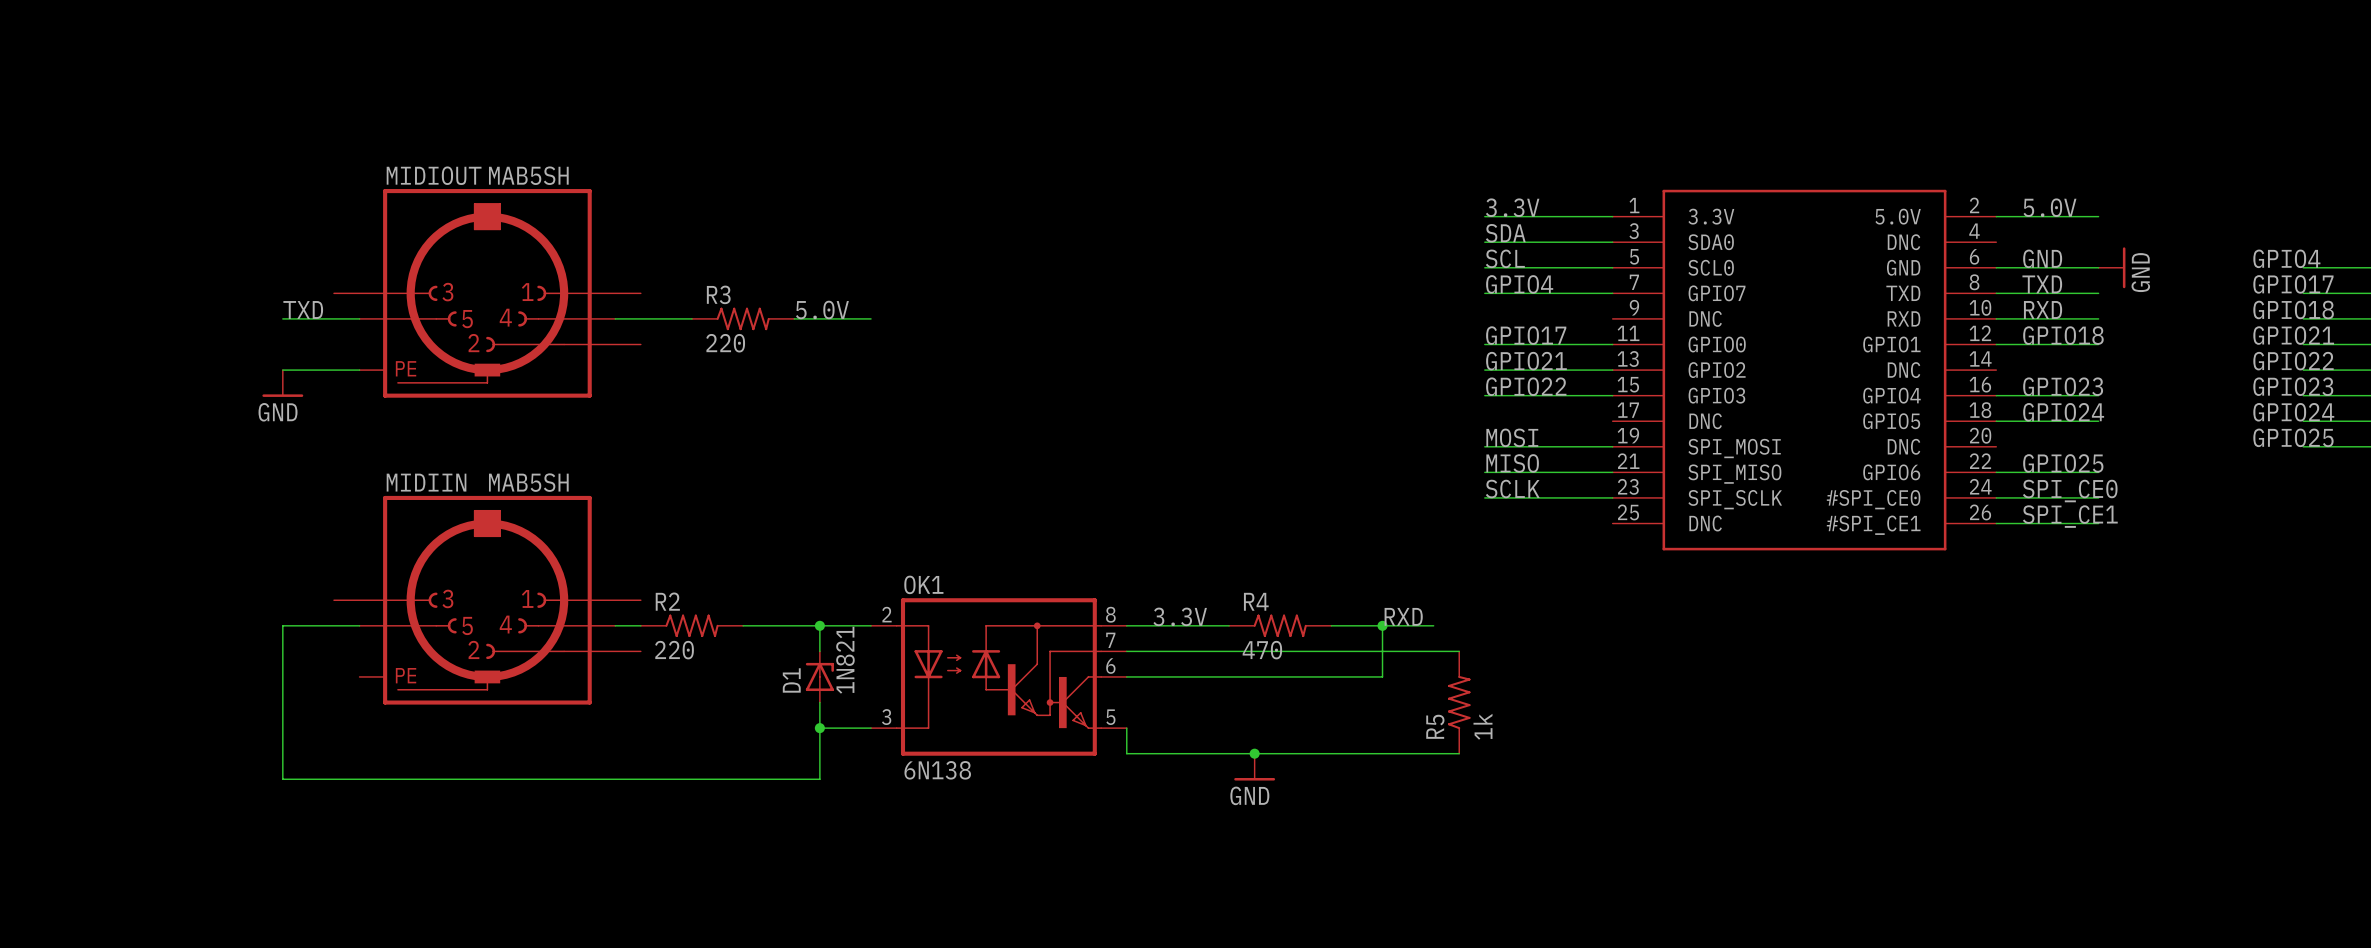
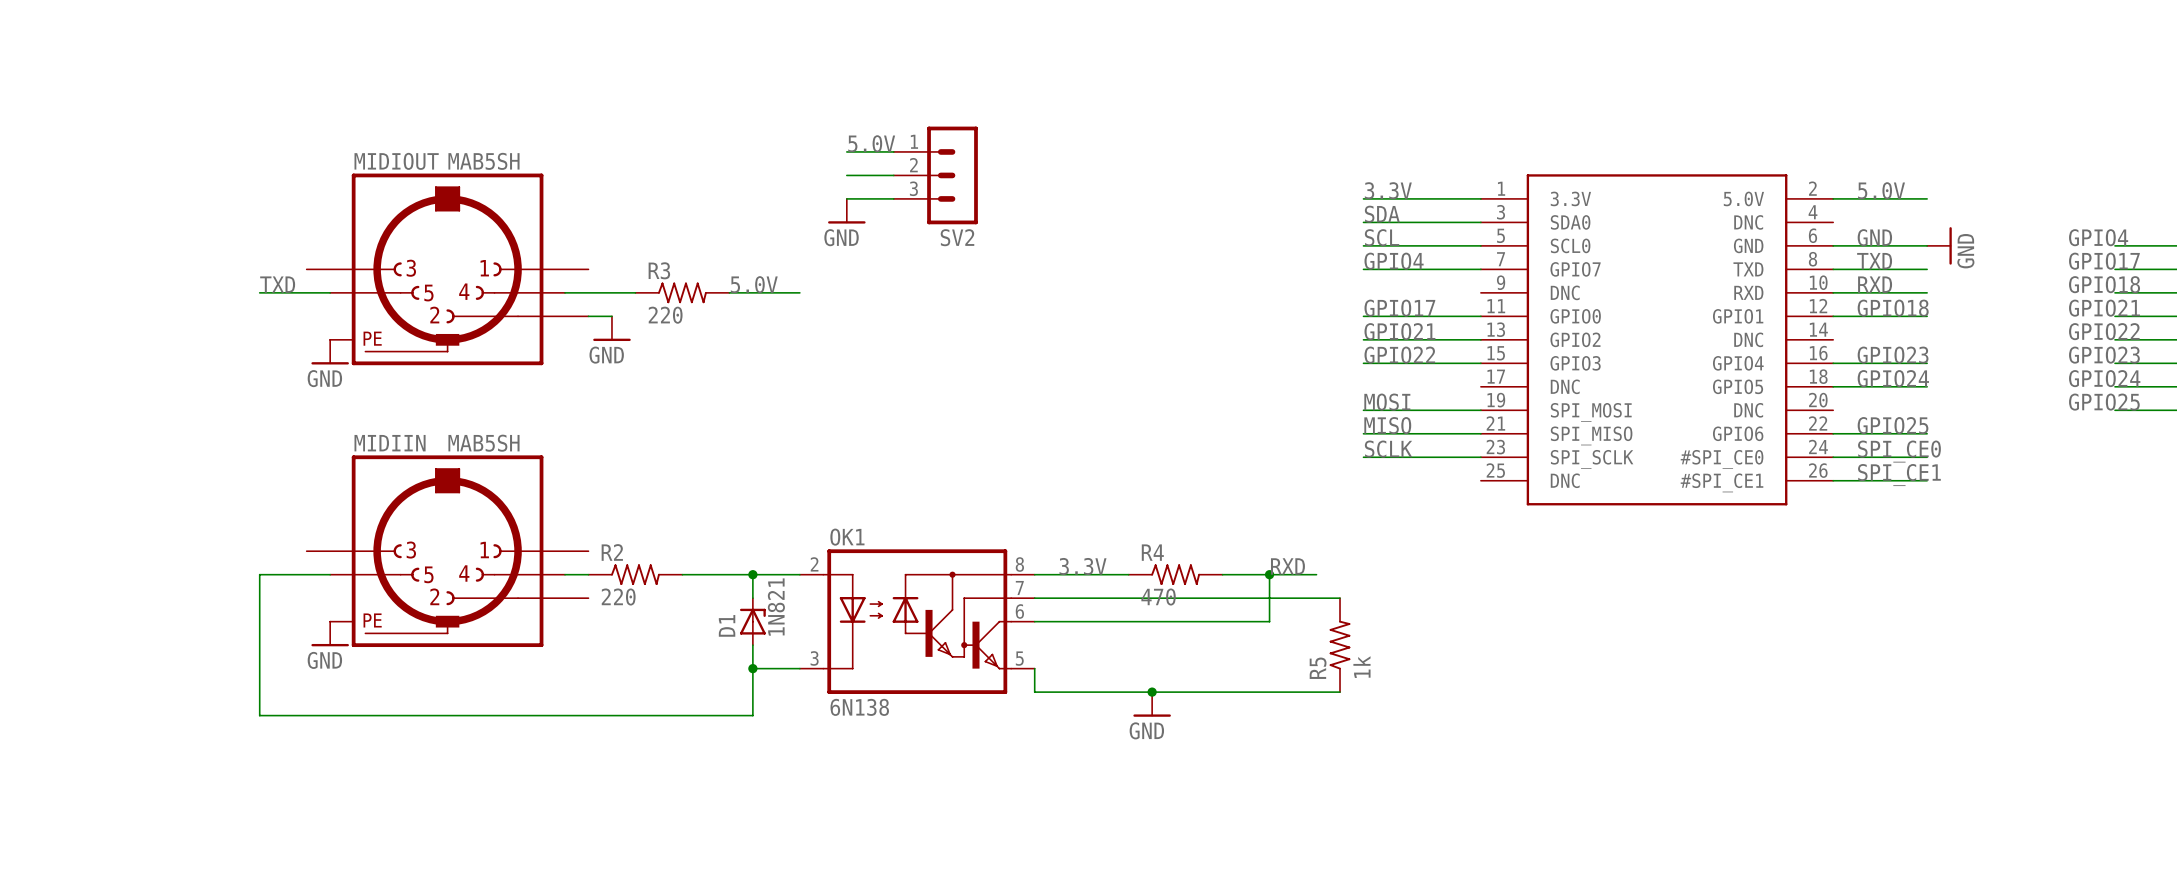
label: none -> 5.0V (871, 143)
wire: none -> (846, 151) (893, 151)
wire: none -> (846, 175) (893, 175)
SV2: none -> (935, 175)
wire: none -> (846, 198) (893, 198)
power symbol: none -> GND (846, 211)
wire: none -> (588, 316) (611, 316)
power symbol: none -> GND (611, 328)
wire: (282, 370) (359, 370) -> none
power symbol position: GND (282, 383) -> GND (330, 352)
power symbol: none -> GND (330, 633)

